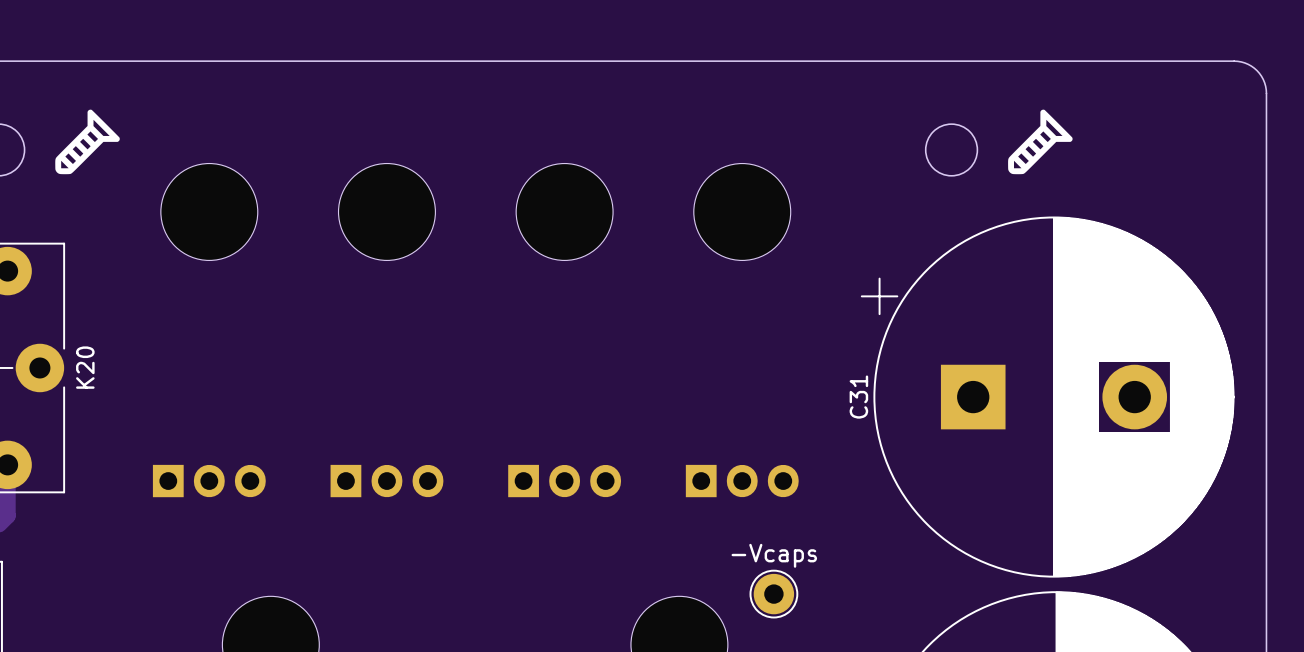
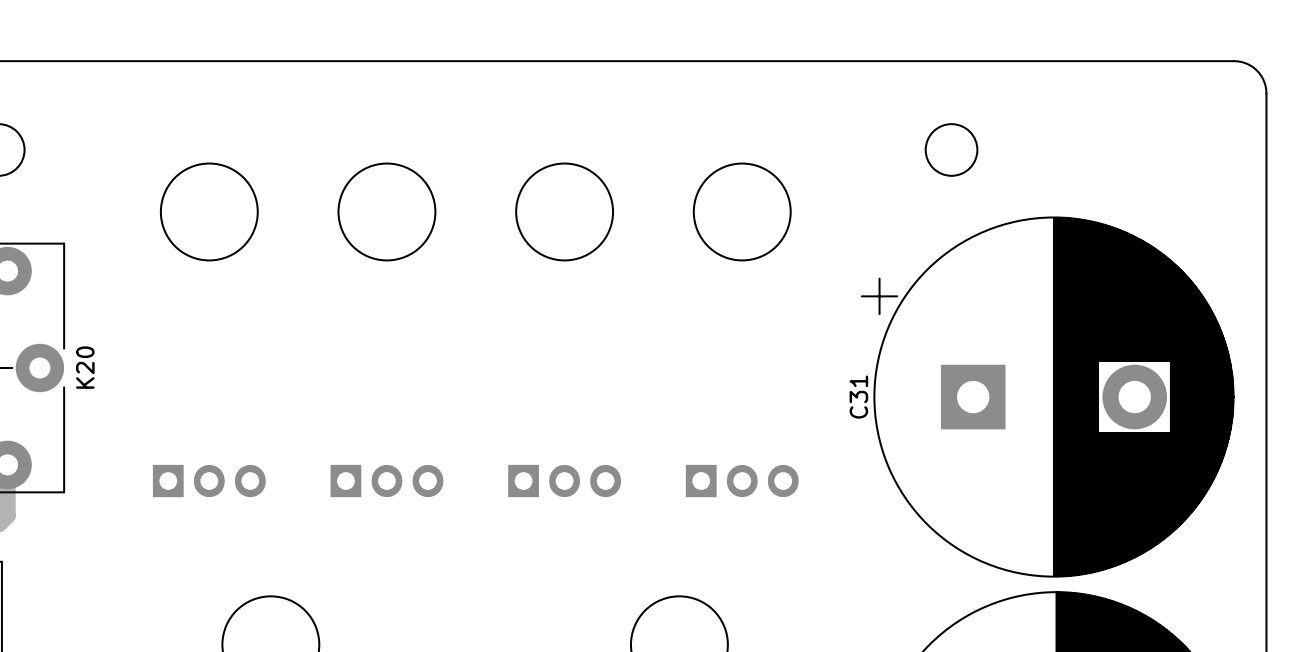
drawing: [55, 109, 120, 175] -> none
drawing: [1008, 109, 1073, 175] -> none
-Vcaps: (773, 594) -> none

